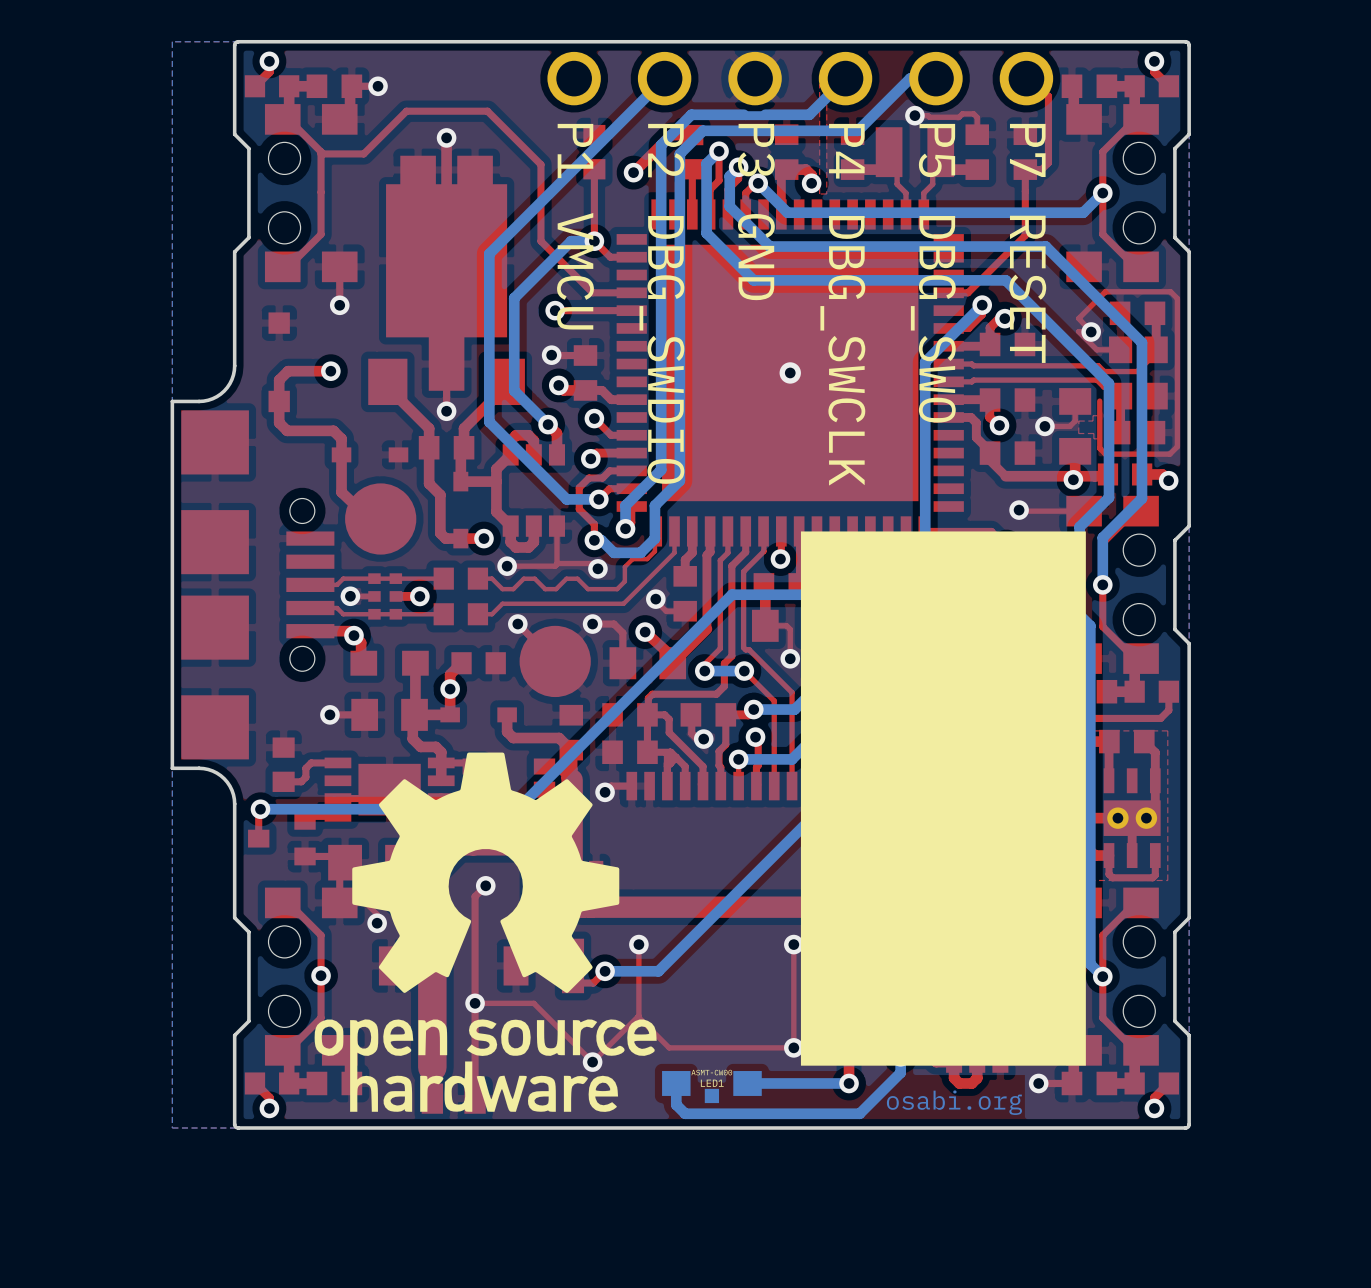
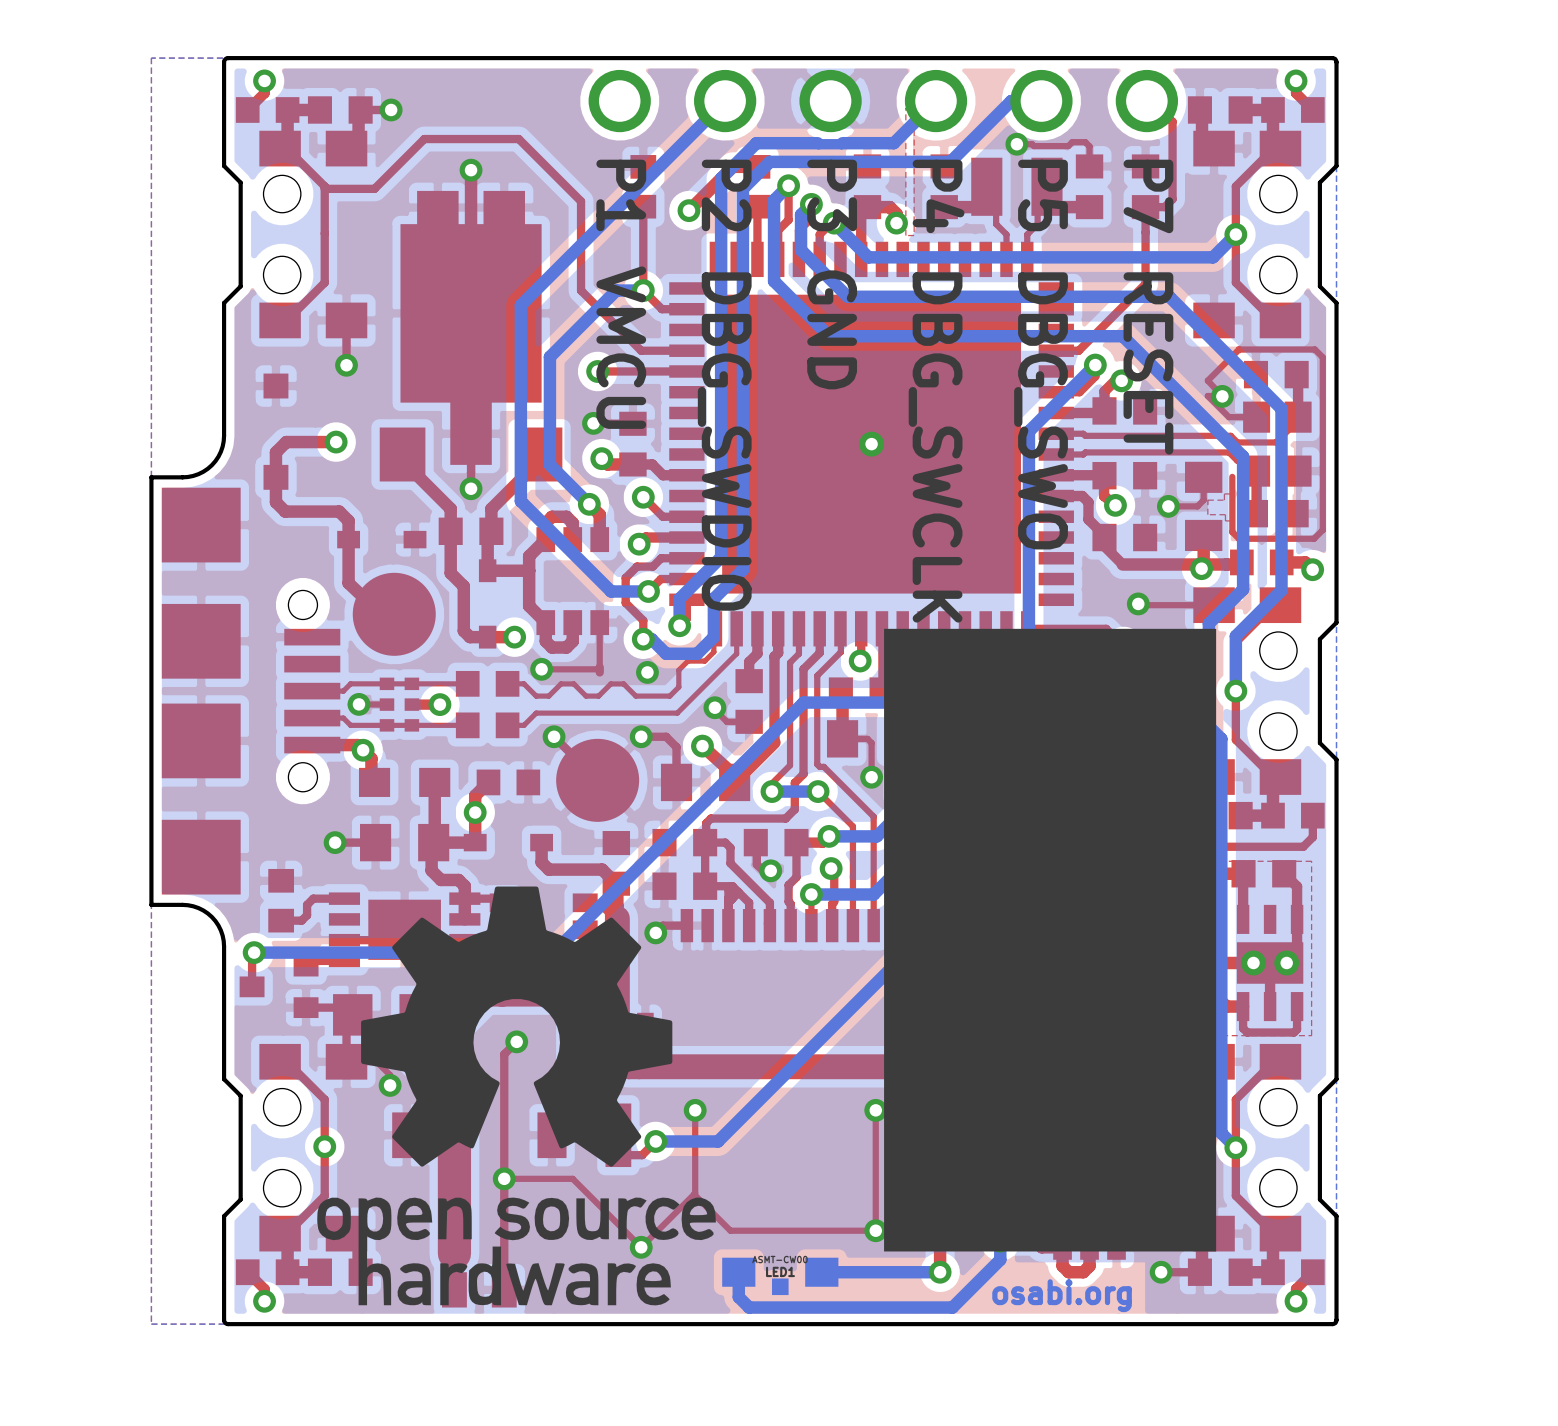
top track: (556, 563) (592, 563) (597, 568) -> (599, 667) (599, 672)

